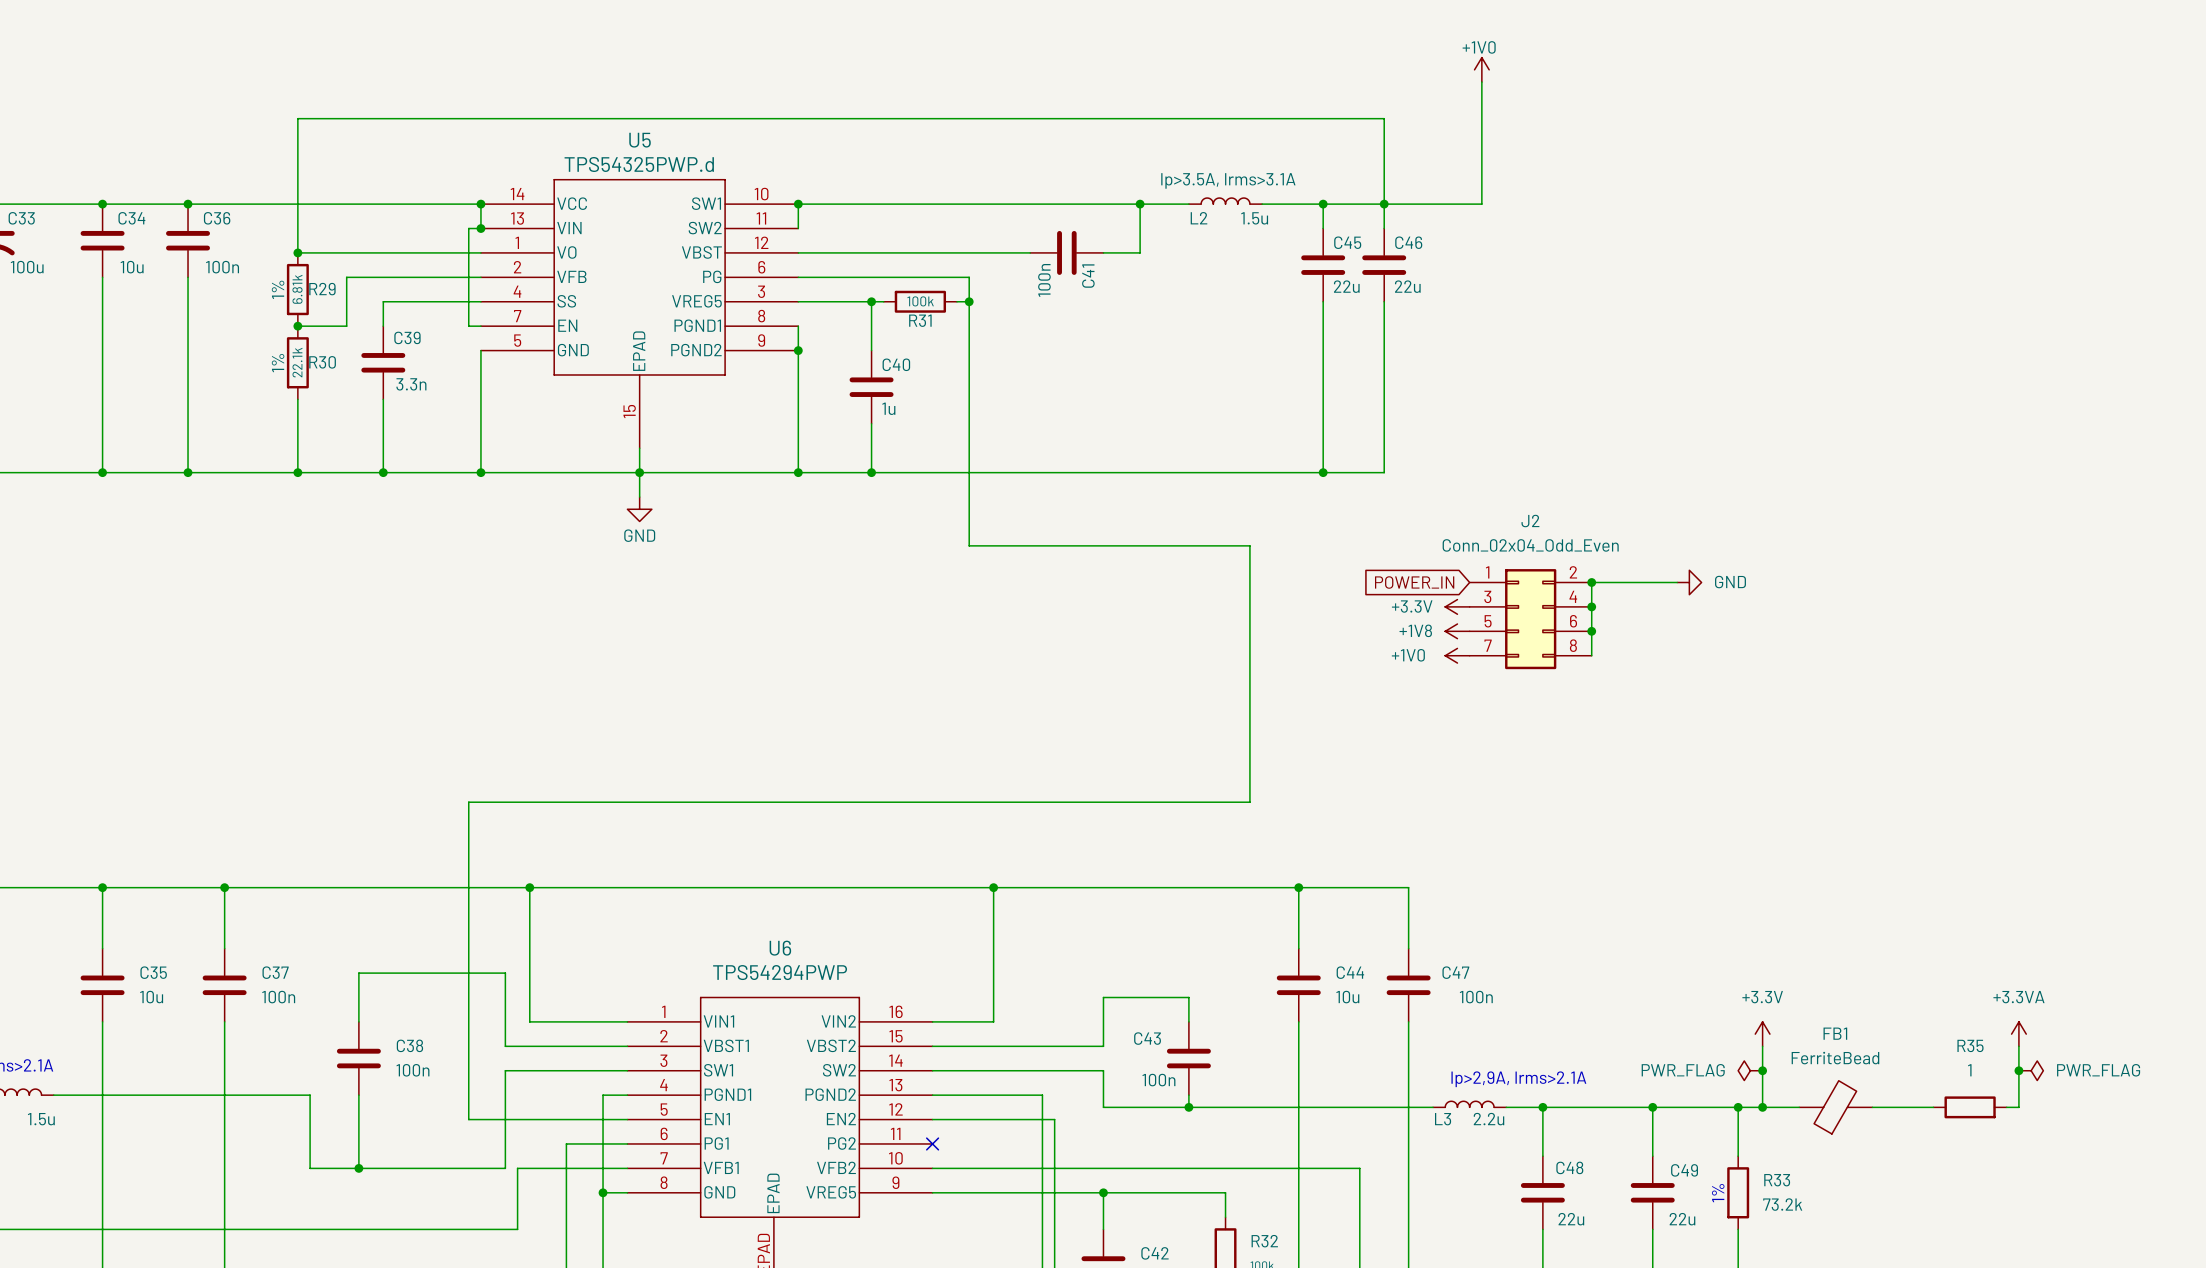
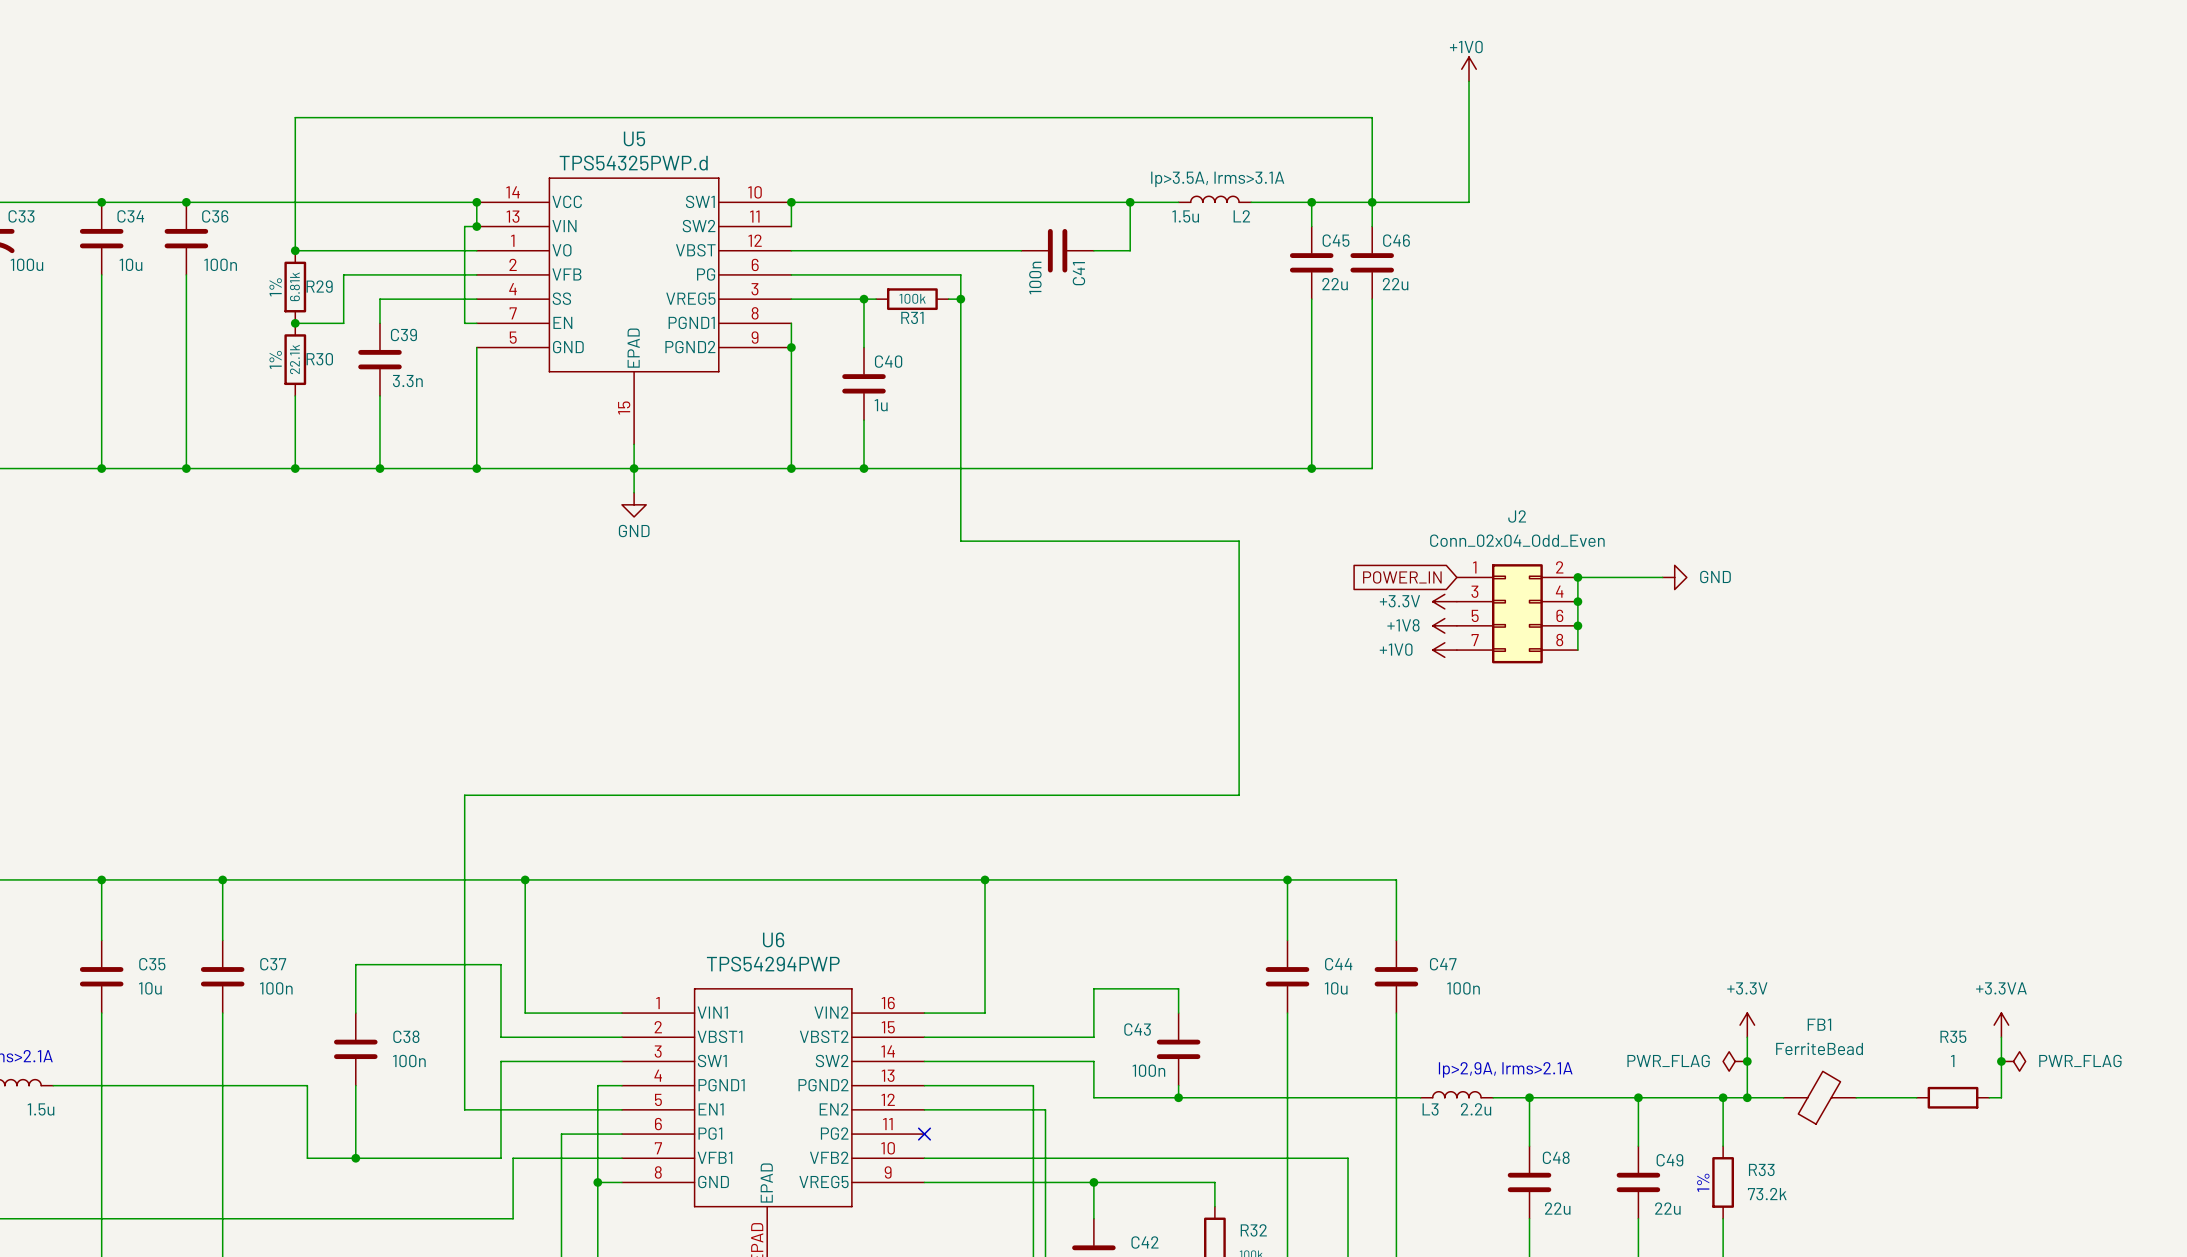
L2 name position: L2 (1198, 218) -> L2 (1241, 216)
L2 value position: 1.5u (1254, 218) -> 1.5u (1185, 216)

